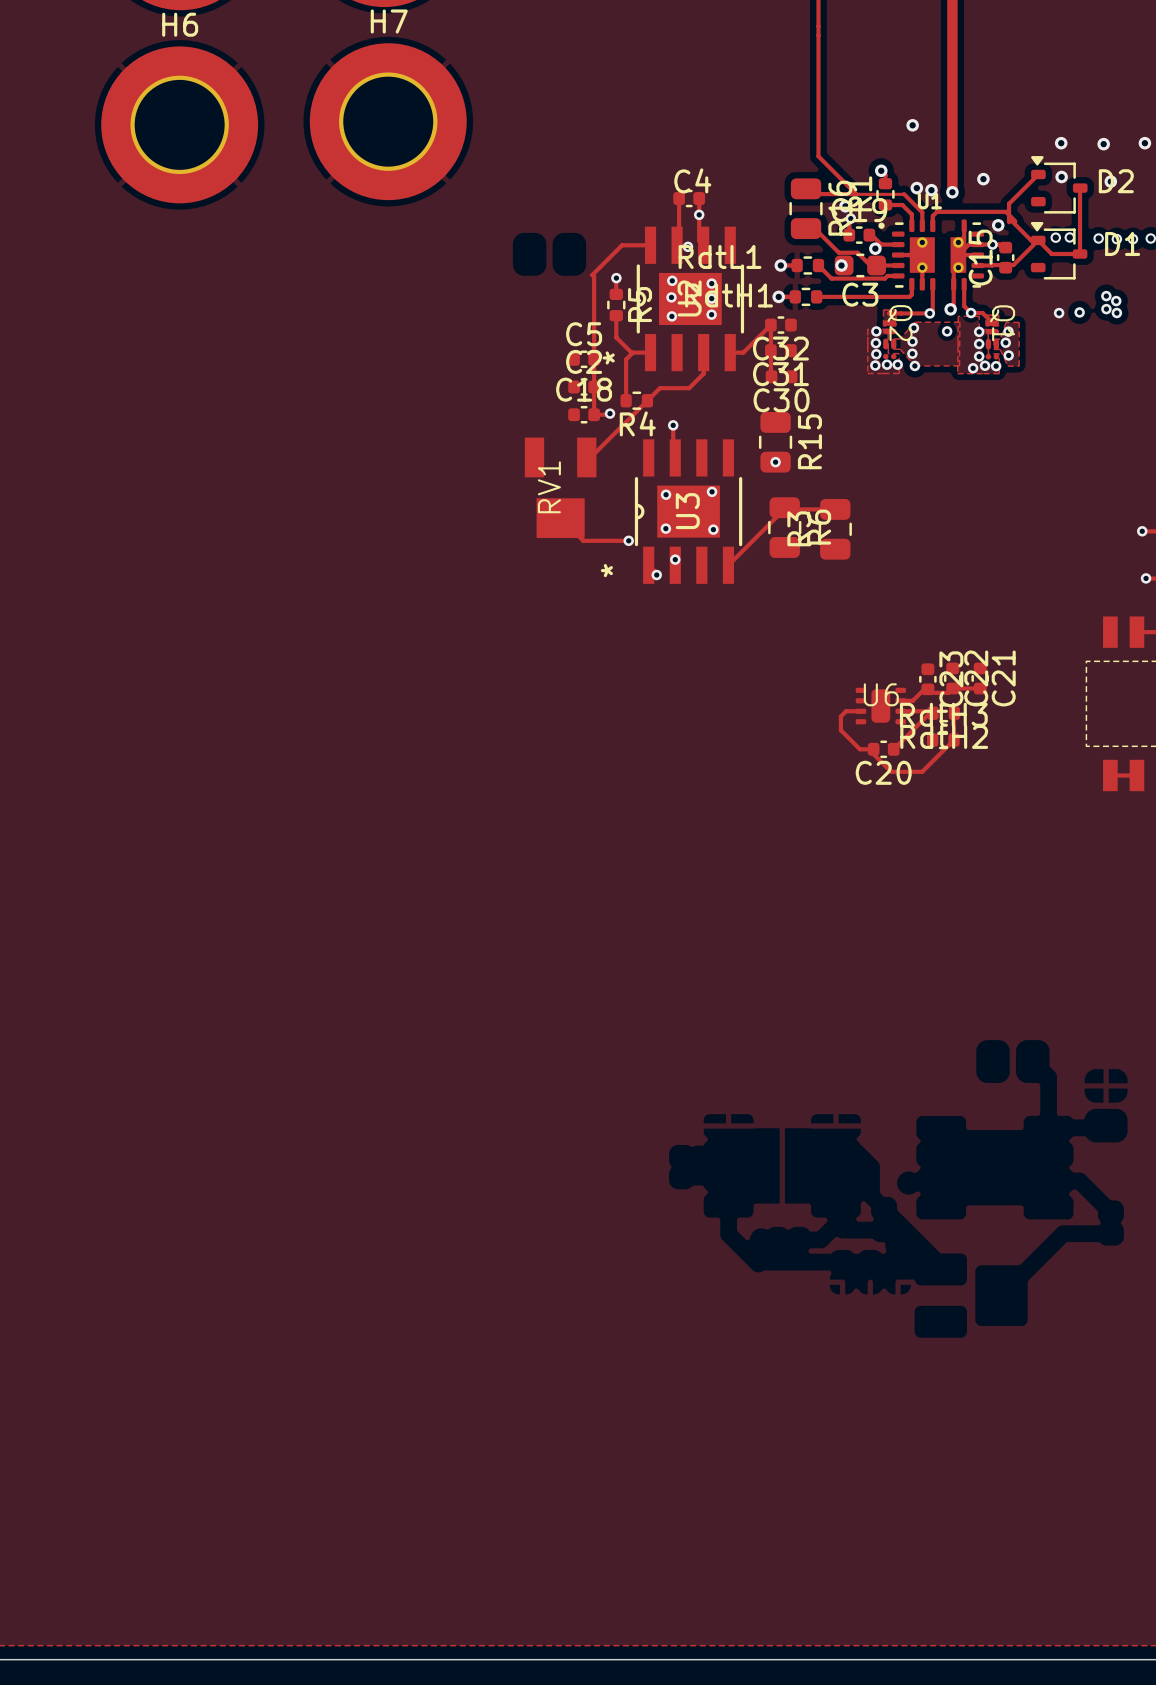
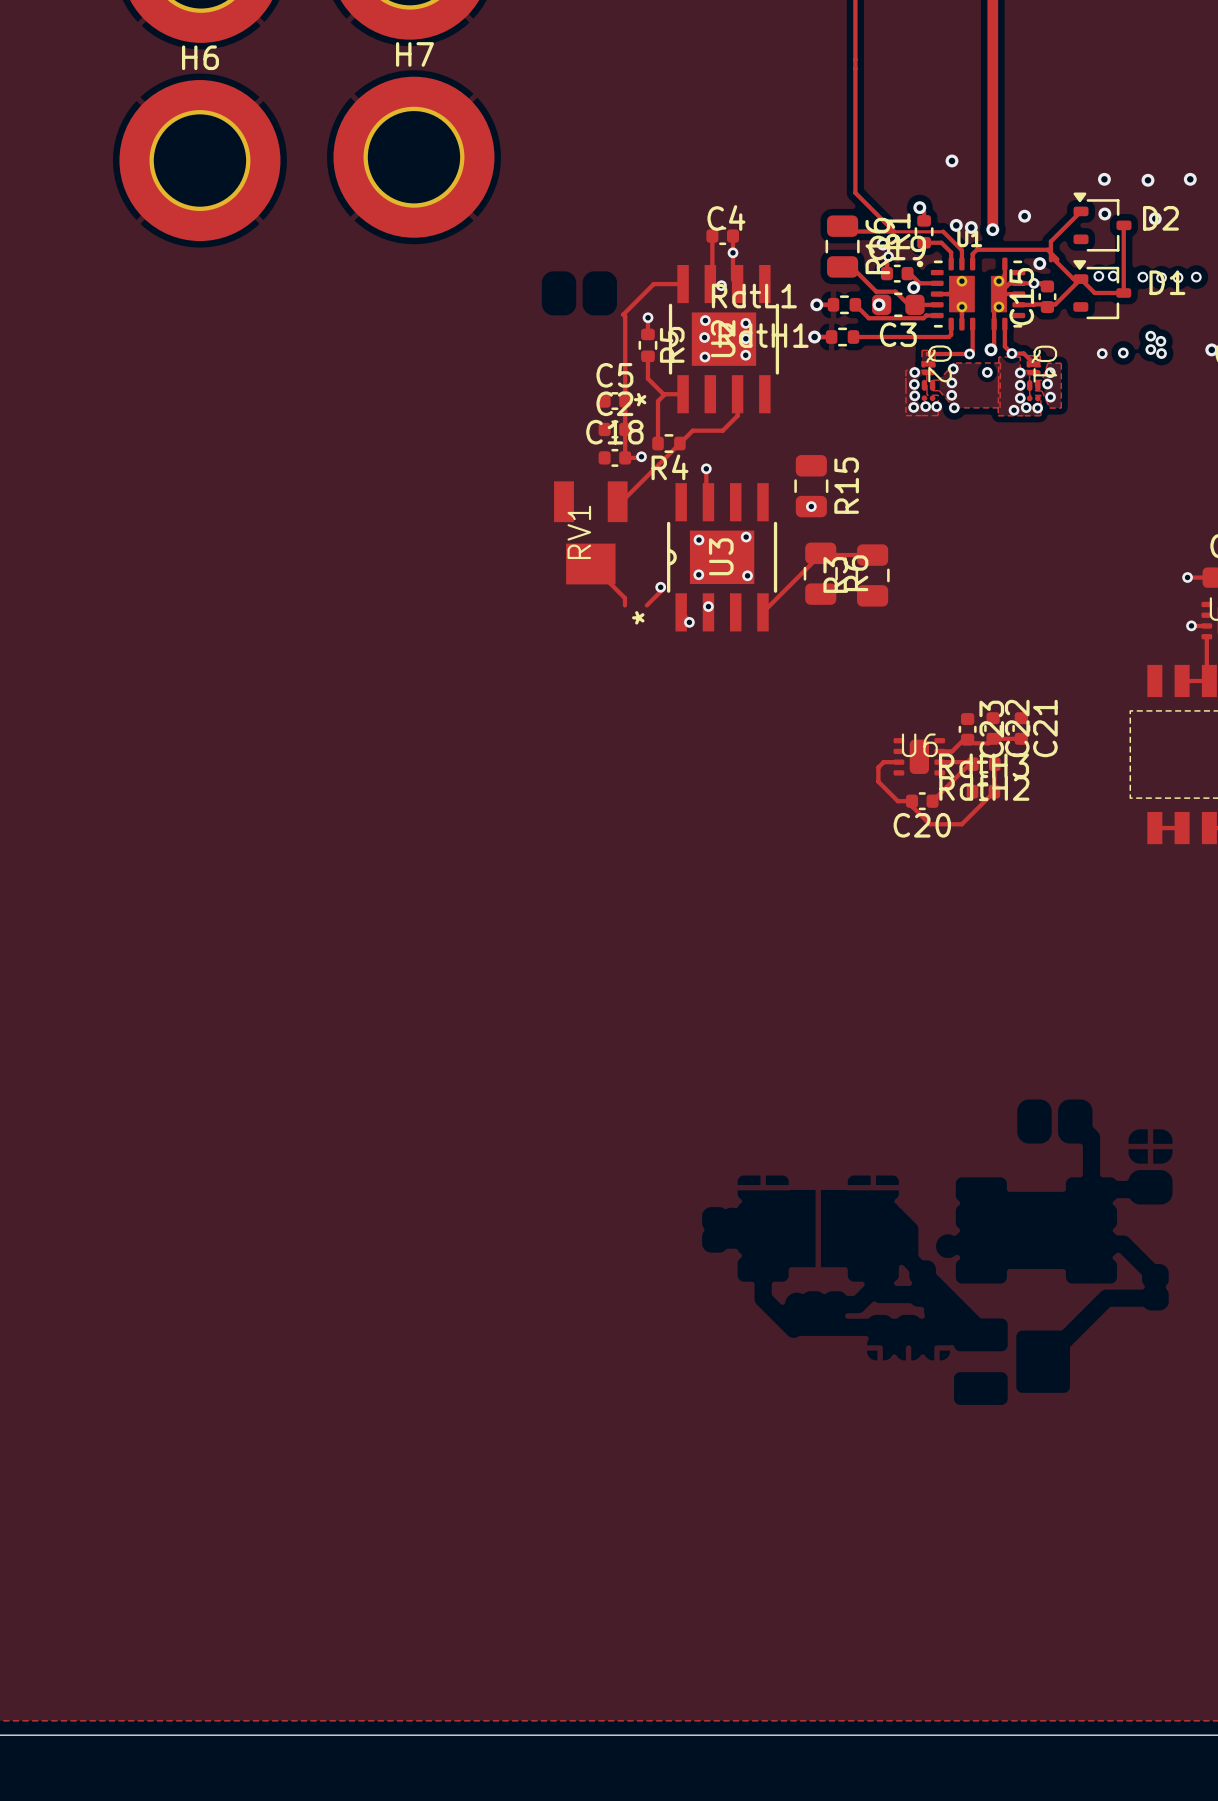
C32: (780, 325) -> none
C31: (780, 350) -> none
track: (730, 352) (743, 352) (770, 325) (771, 376) -> none
C30: (781, 376) -> none
track: (583, 540) (628, 540) -> (646, 605) (660, 591) (660, 587)
track: none -> (614, 587) (624, 598) (624, 605)

